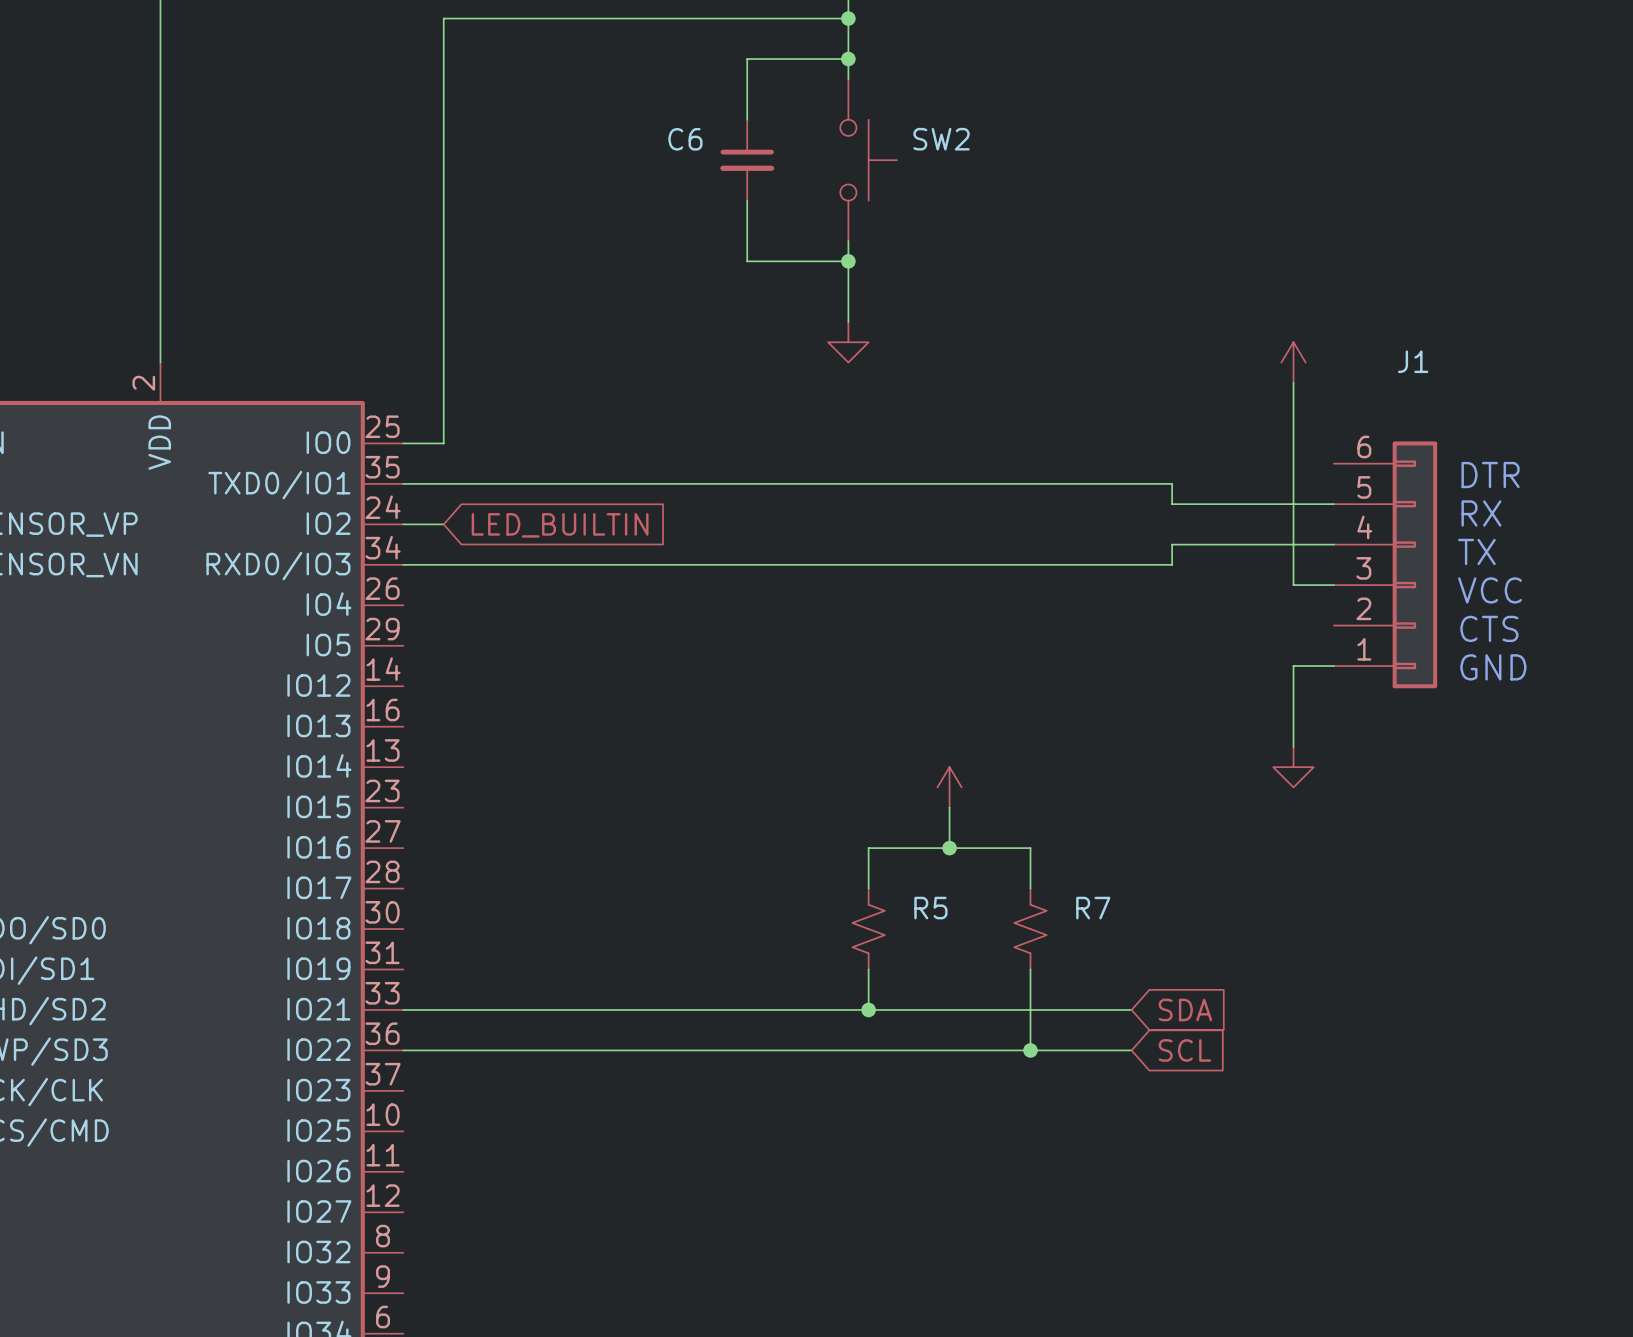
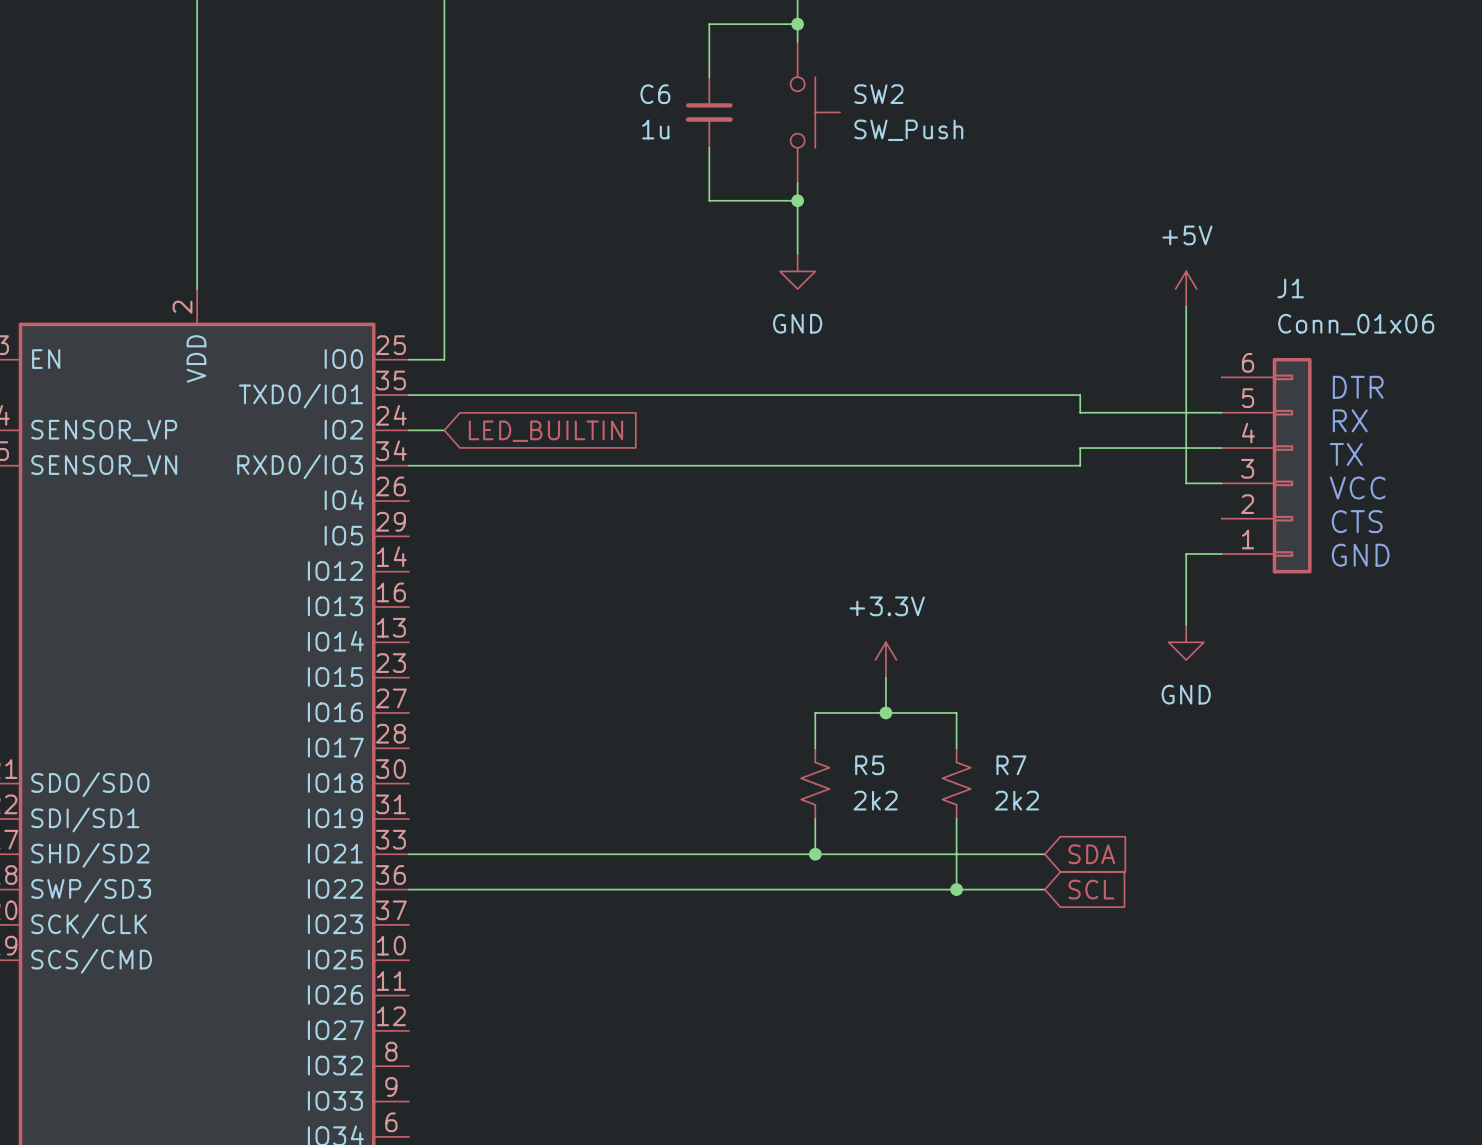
C6 value: none -> 1u (655, 129)
SW2 value: none -> SW_Push (908, 130)
power symbol text: none -> +5V (1187, 235)
power symbol text: none -> GND (797, 323)
J1 value: none -> Conn_01x06 (1356, 324)
power symbol text: none -> +3.3V (887, 606)
power symbol text: none -> GND (1186, 694)
R5 value: none -> 2k2 (875, 800)
R7 value: none -> 2k2 (1016, 800)

